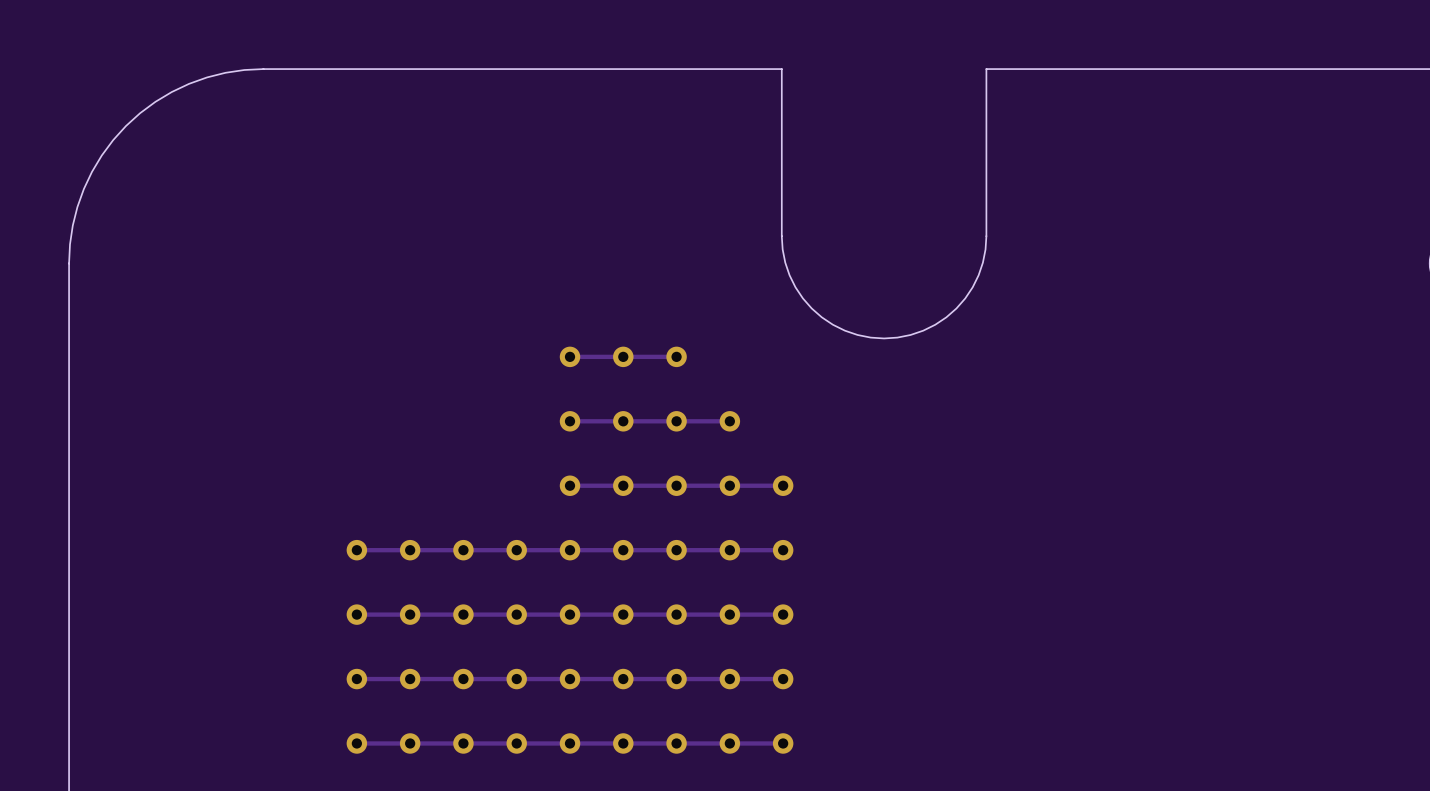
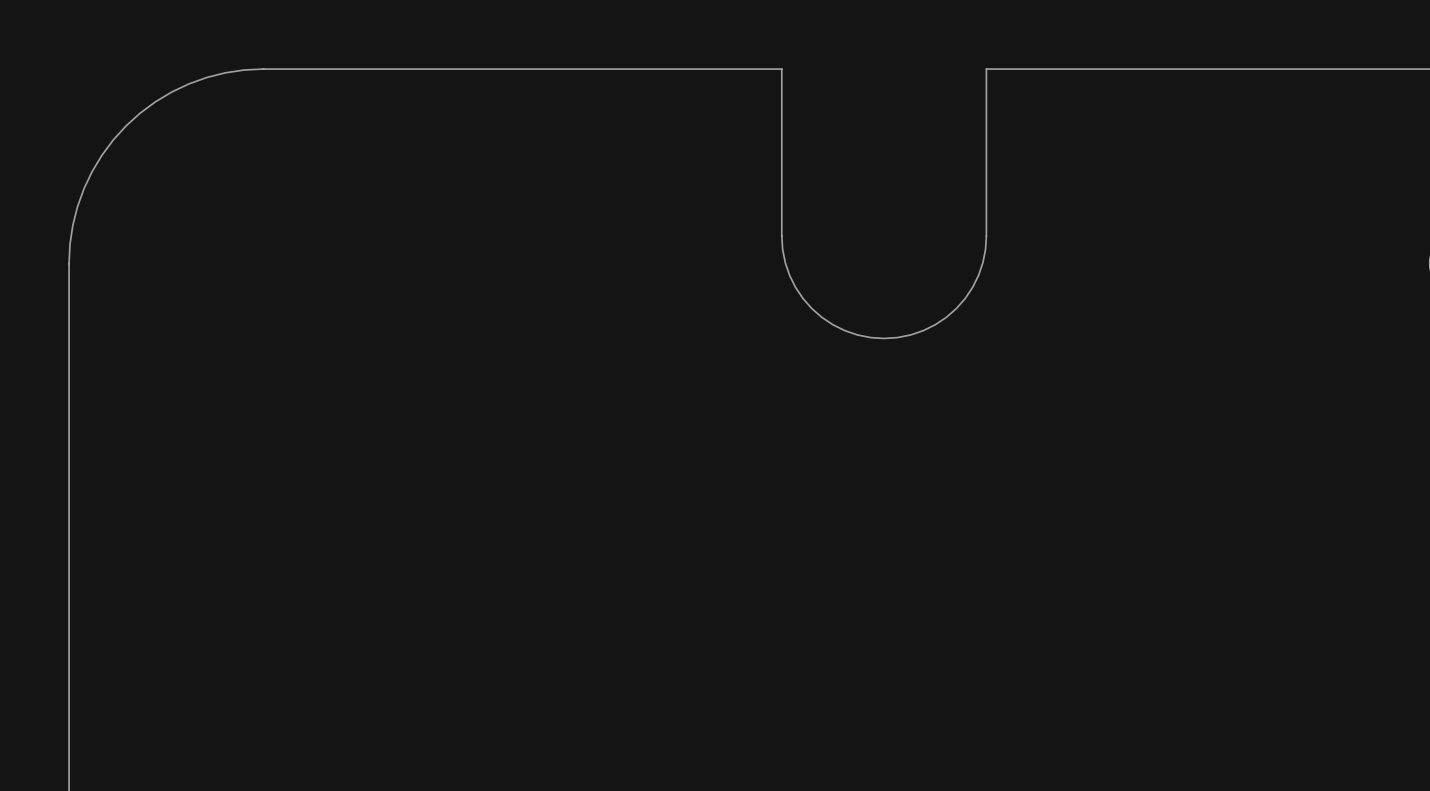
via: (570, 356) -> none
via: (623, 356) -> none
track: (676, 356) (570, 356) -> none
via: (676, 356) -> none
via: (570, 421) -> none
via: (623, 421) -> none
via: (676, 421) -> none
track: (729, 421) (570, 421) -> none
via: (729, 421) -> none
via: (570, 485) -> none
via: (623, 485) -> none
via: (676, 485) -> none
via: (729, 485) -> none
track: (783, 485) (570, 485) -> none
via: (783, 485) -> none
via: (356, 550) -> none
via: (410, 550) -> none
via: (463, 550) -> none
via: (516, 550) -> none
via: (570, 550) -> none
via: (623, 550) -> none
via: (676, 550) -> none
via: (729, 550) -> none
track: (783, 550) (356, 550) -> none
via: (783, 550) -> none
via: (356, 614) -> none
via: (410, 614) -> none
via: (463, 614) -> none
via: (516, 614) -> none
via: (570, 614) -> none
via: (623, 614) -> none
via: (676, 614) -> none
via: (729, 614) -> none
track: (783, 614) (356, 614) -> none
via: (783, 614) -> none
via: (356, 679) -> none
via: (410, 679) -> none
via: (463, 679) -> none
via: (516, 679) -> none
via: (570, 679) -> none
via: (623, 679) -> none
via: (676, 679) -> none
via: (729, 679) -> none
track: (783, 679) (356, 679) -> none
via: (783, 679) -> none
via: (356, 743) -> none
via: (410, 743) -> none
via: (463, 743) -> none
via: (516, 743) -> none
via: (570, 743) -> none
via: (623, 743) -> none
via: (676, 743) -> none
via: (729, 743) -> none
track: (783, 743) (356, 743) -> none
via: (783, 743) -> none

